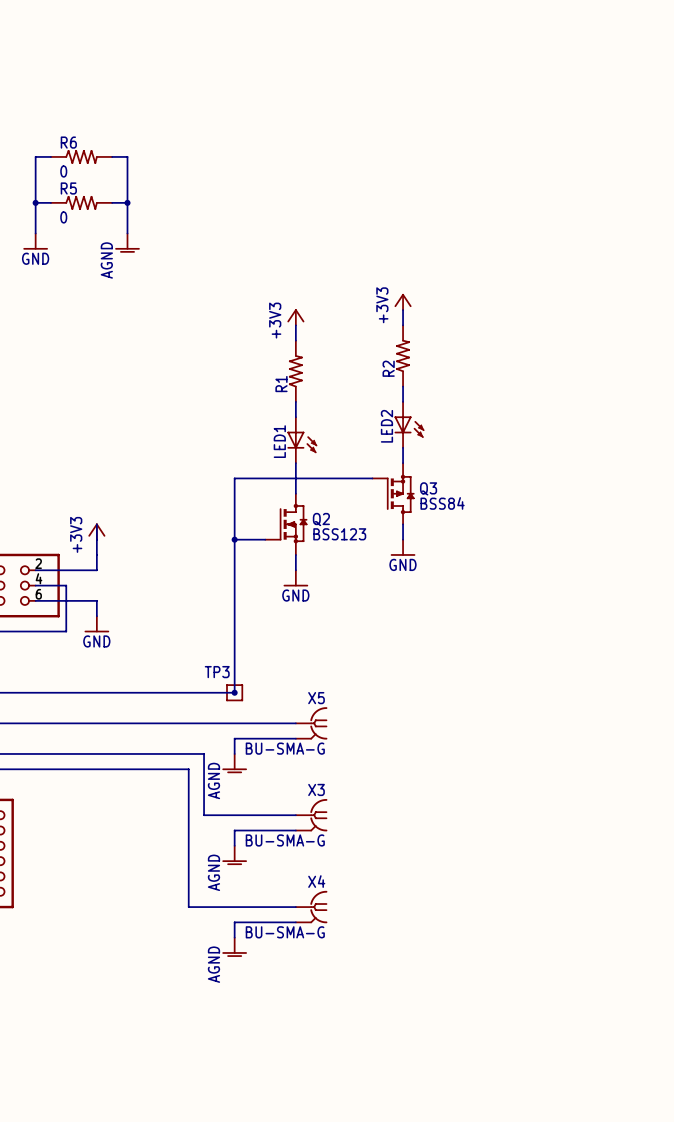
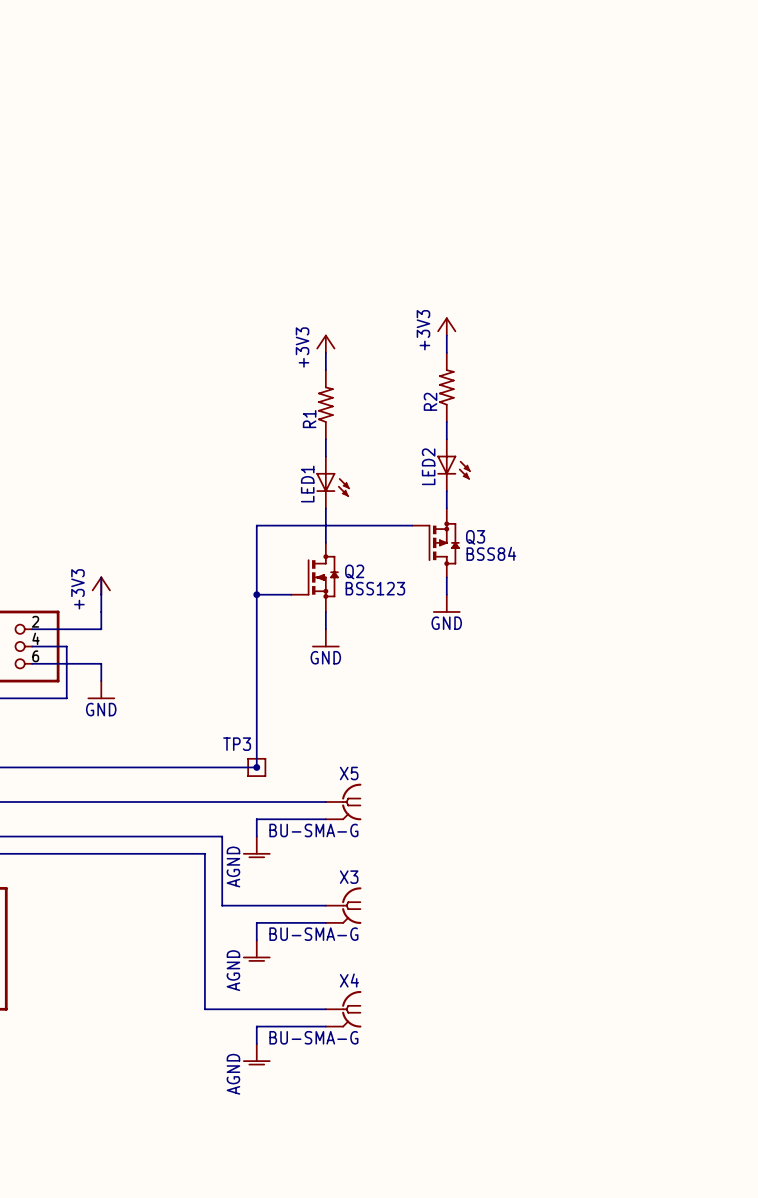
wire: (50, 156) (35, 156) (35, 233) -> none
R6: 0 (81, 156) -> none
wire: (112, 156) (127, 156) (127, 233) -> none
wire: (35, 202) (50, 202) -> none
junction: (35, 202) -> none
R5: 0 (81, 202) -> none
wire: (112, 202) (127, 202) -> none
junction: (127, 202) -> none
power symbol: GND (35, 241) -> none
power symbol: AGND (127, 243) -> none

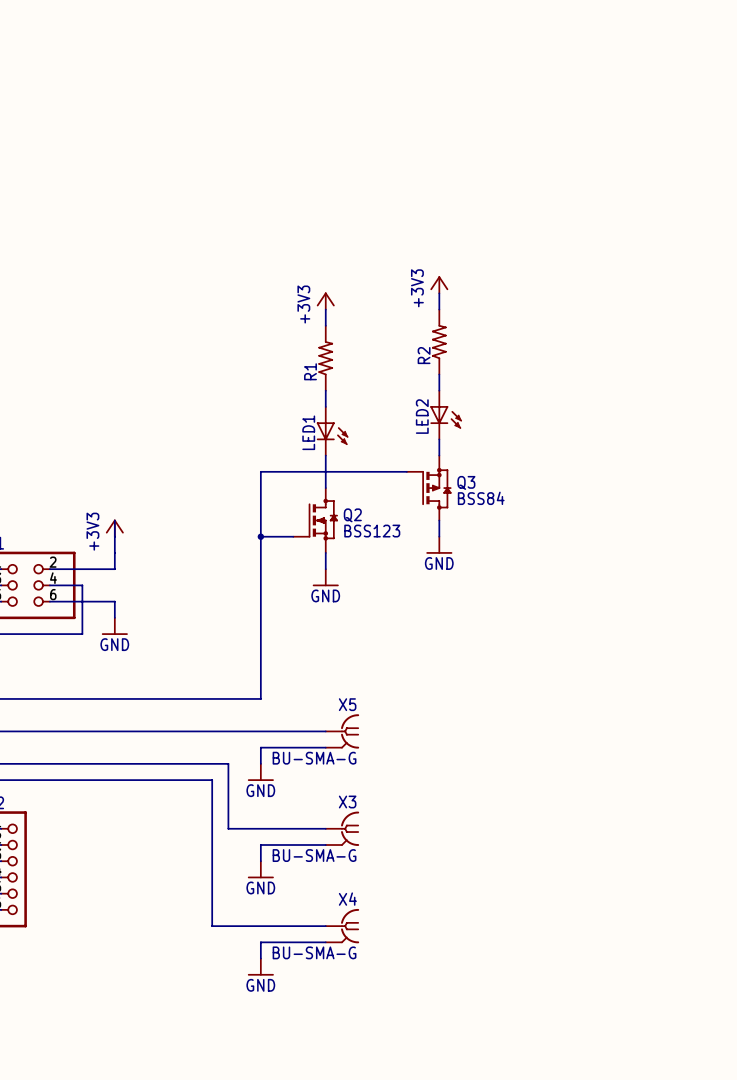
TP3: (256, 767) -> none
junction: (256, 767) -> none
power symbol: AGND (256, 847) -> GND (260, 772)
power symbol: AGND (256, 950) -> GND (260, 869)
power symbol: AGND (256, 1054) -> GND (260, 967)

